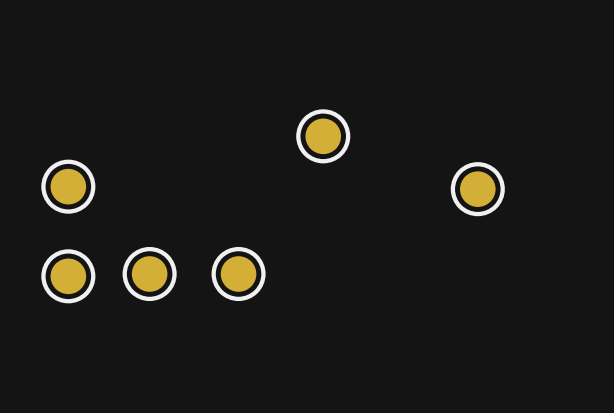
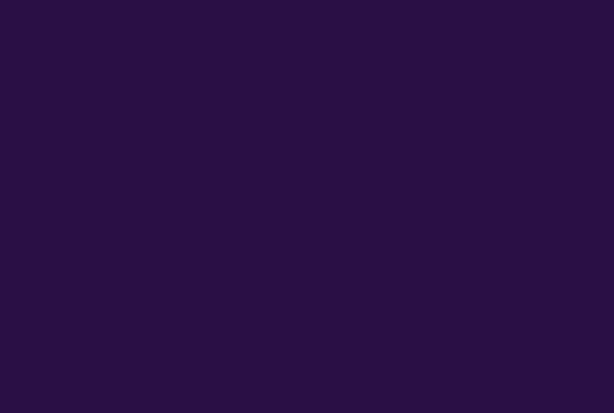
part: (323, 136) -> none
part: (68, 186) -> none
part: (477, 189) -> none
part: (149, 274) -> none
part: (238, 274) -> none
part: (68, 276) -> none

